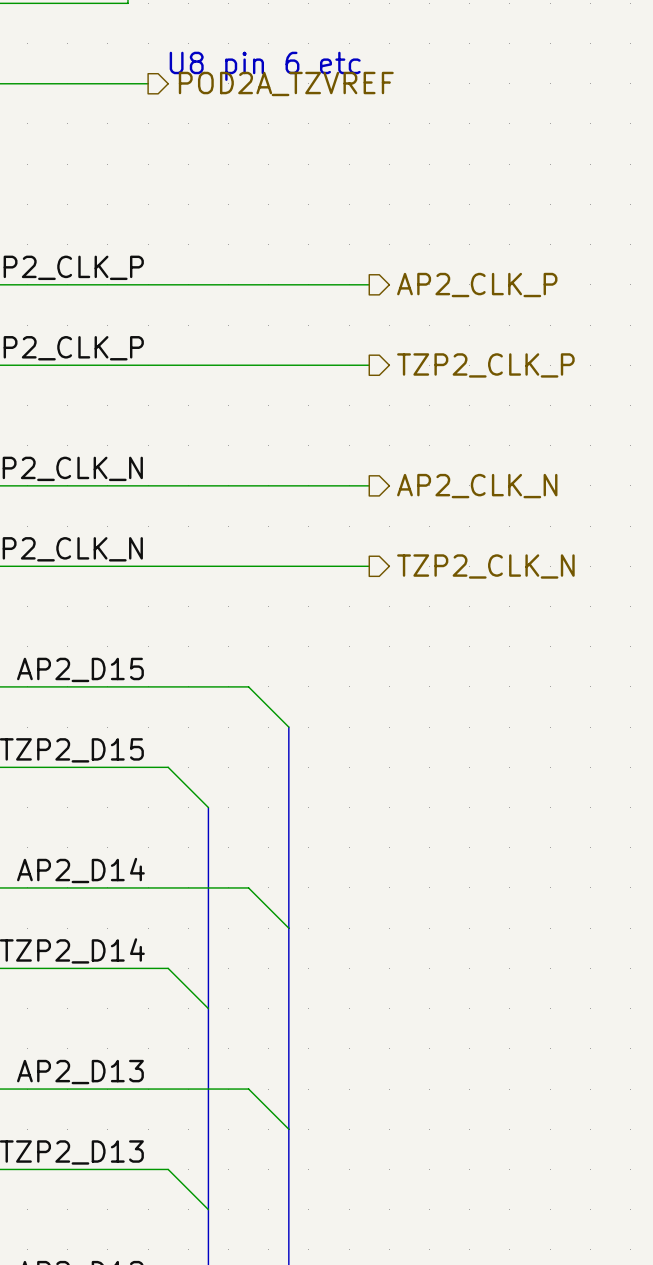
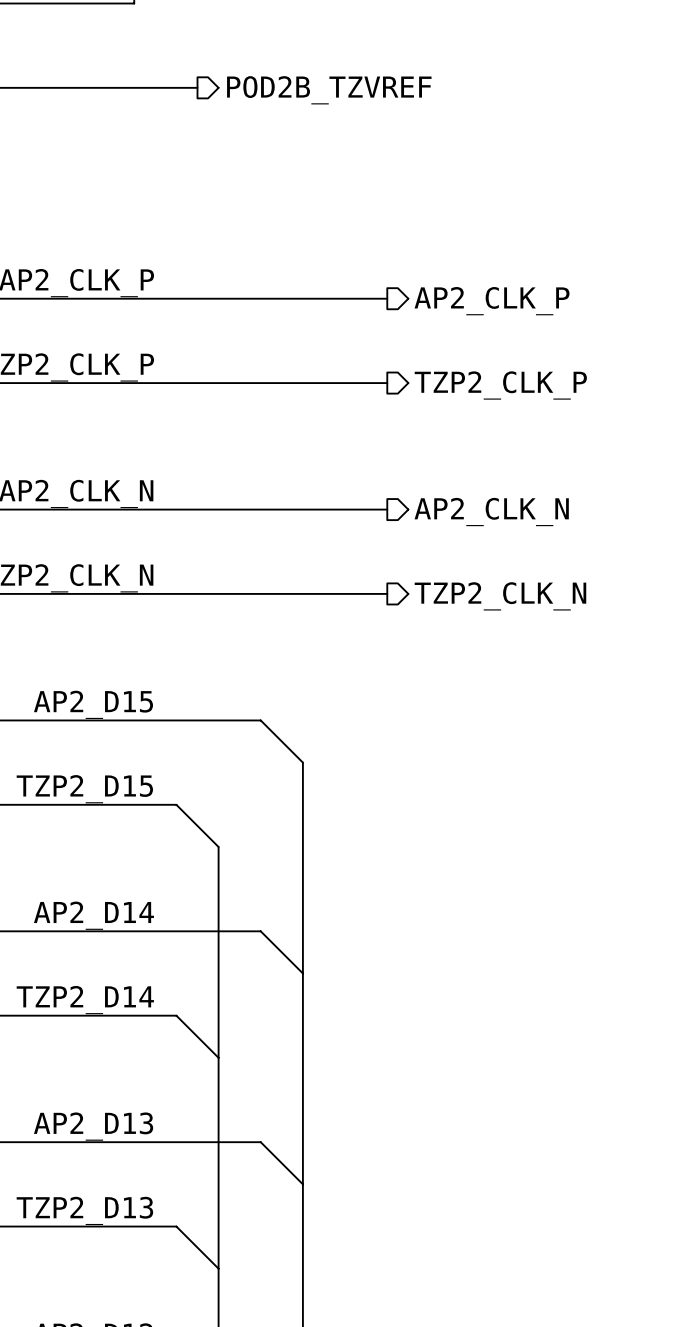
text: U8 pin 6 etc (265, 66) -> none
wire: none -> (155, 87) (197, 87)
hierarchical label: POD2A_TZVREF (286, 83) -> POD2B_TZVREF (329, 90)

